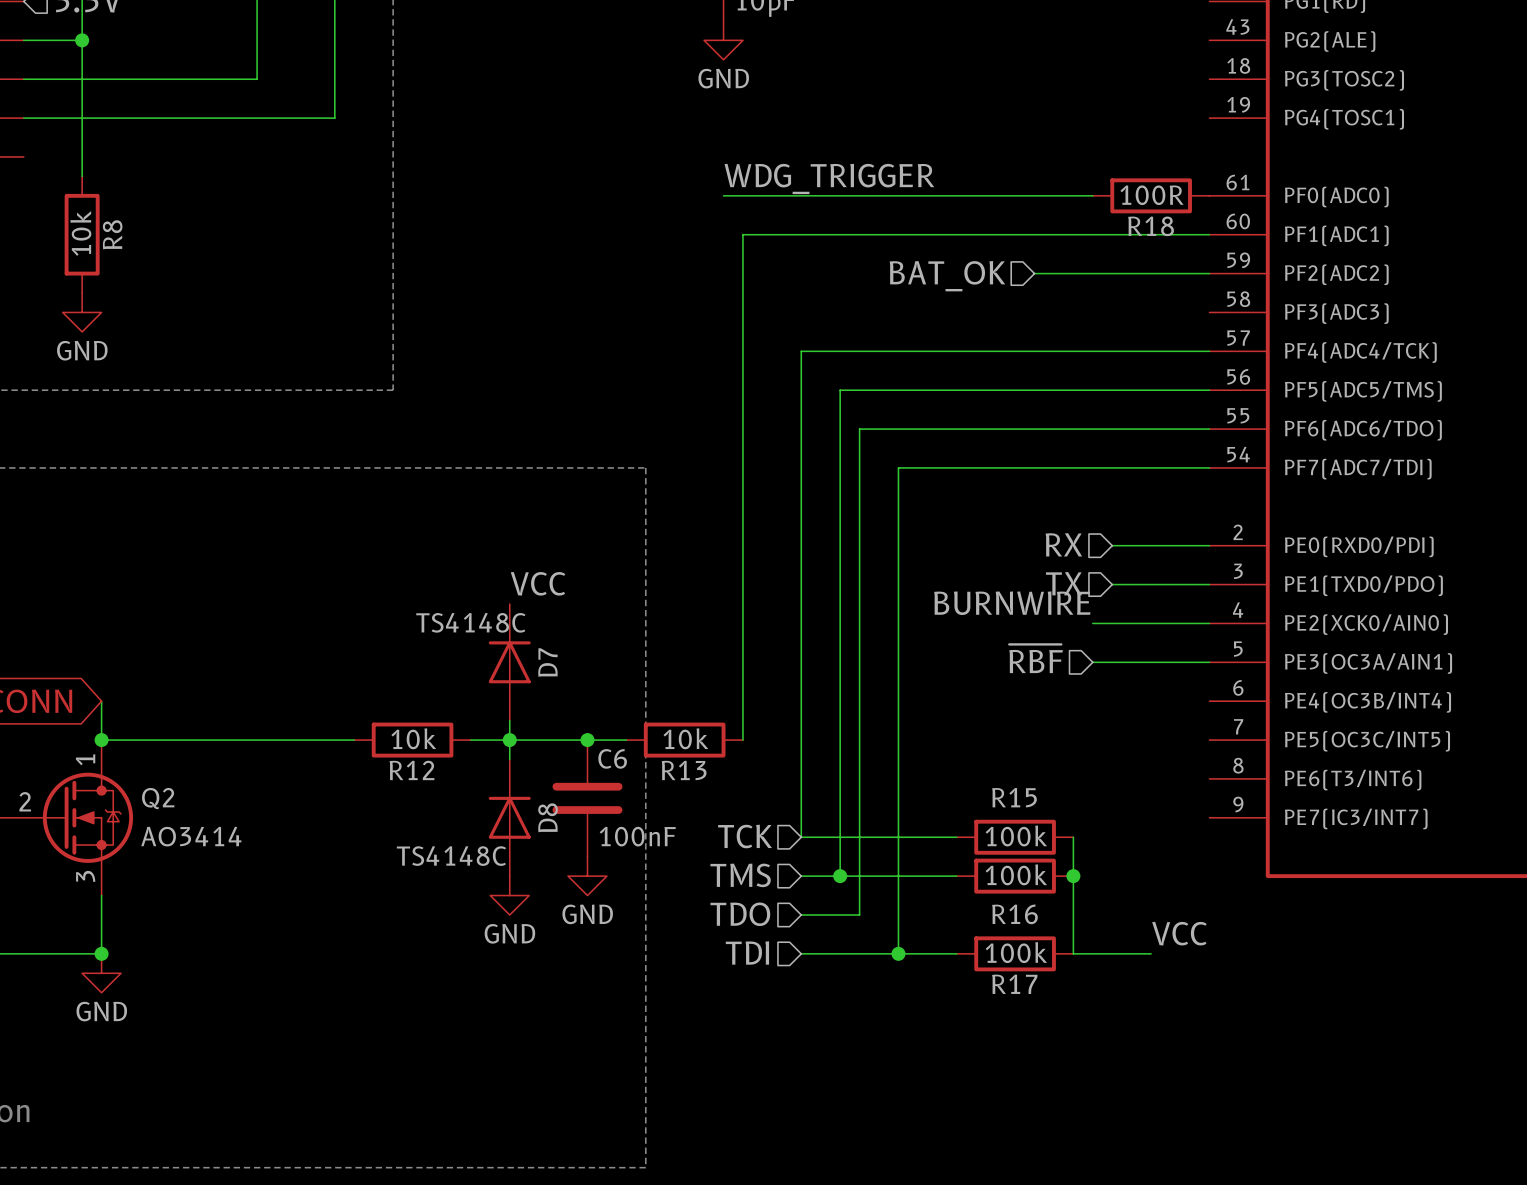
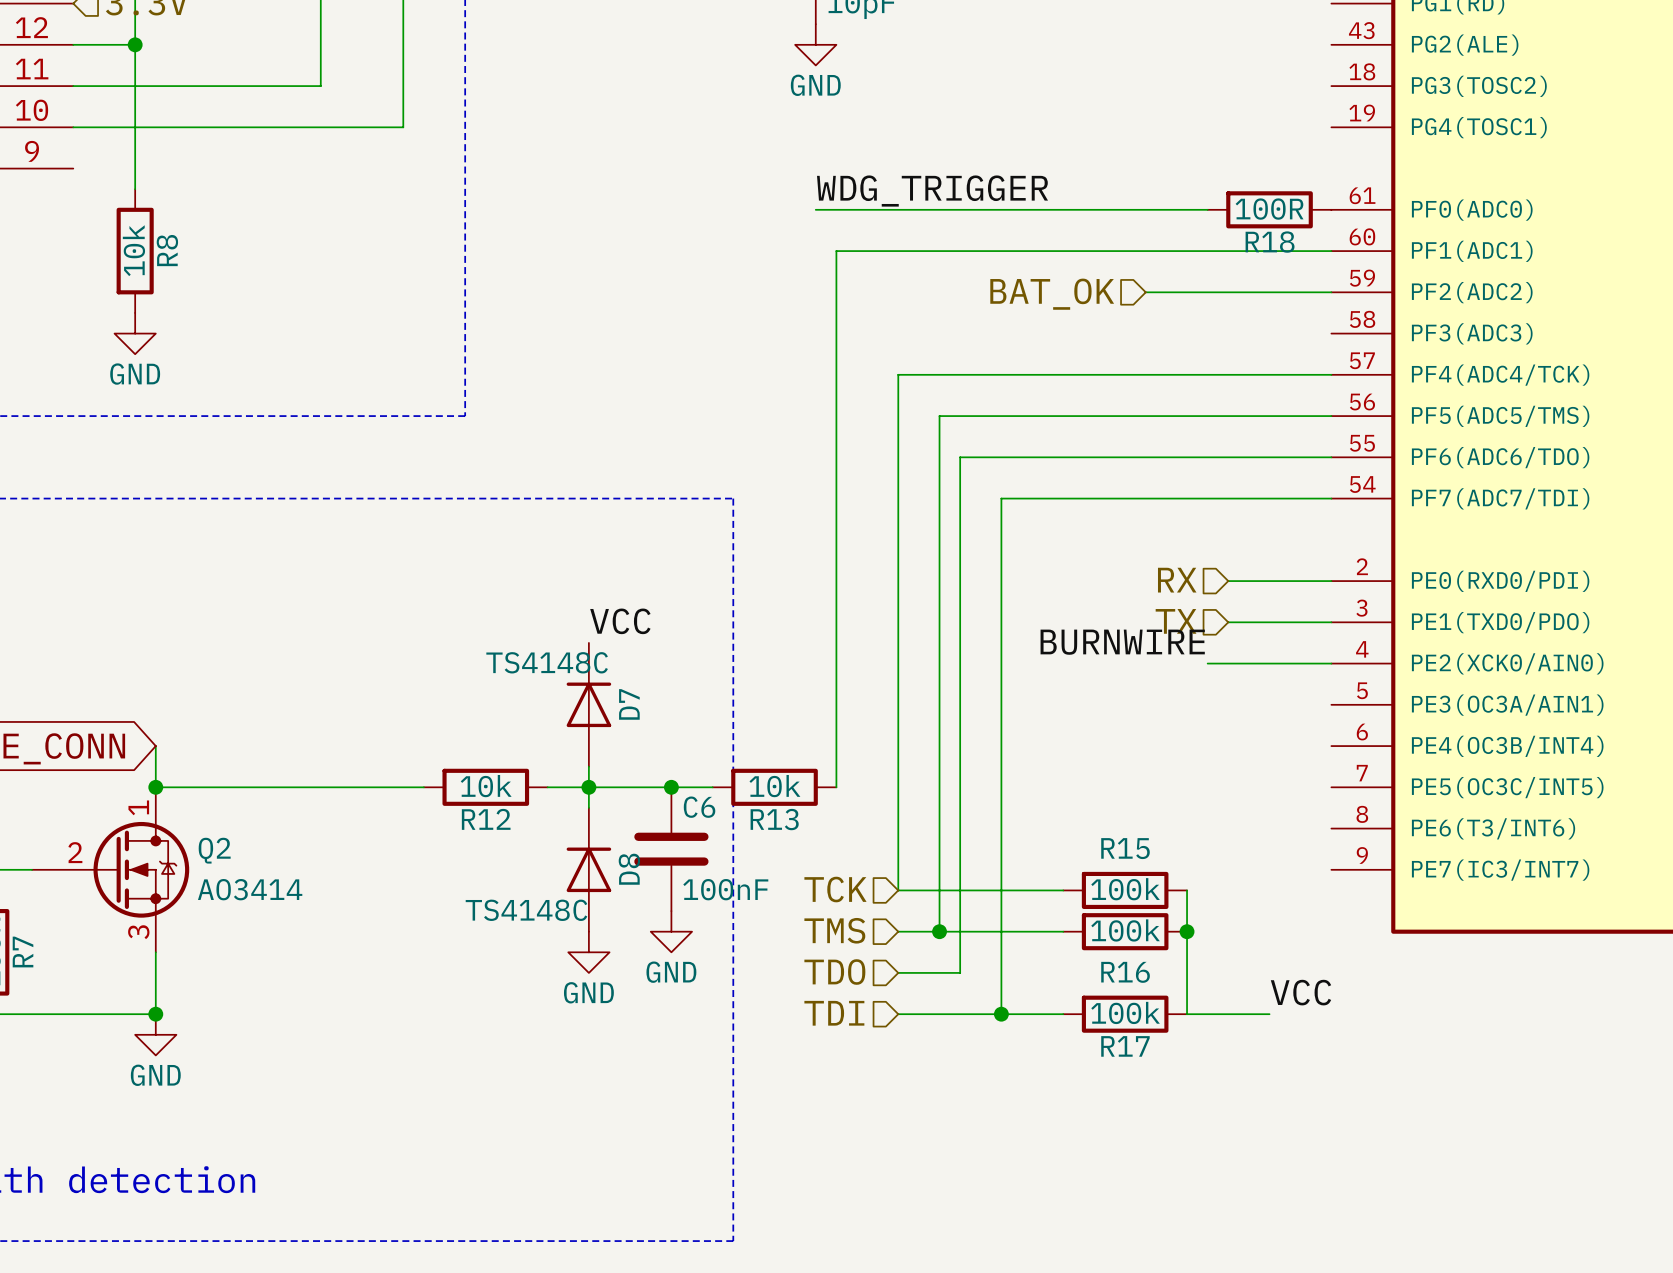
hierarchical label: ~{RBF} (1036, 658) -> none
wire: (1092, 662) (1209, 662) -> none

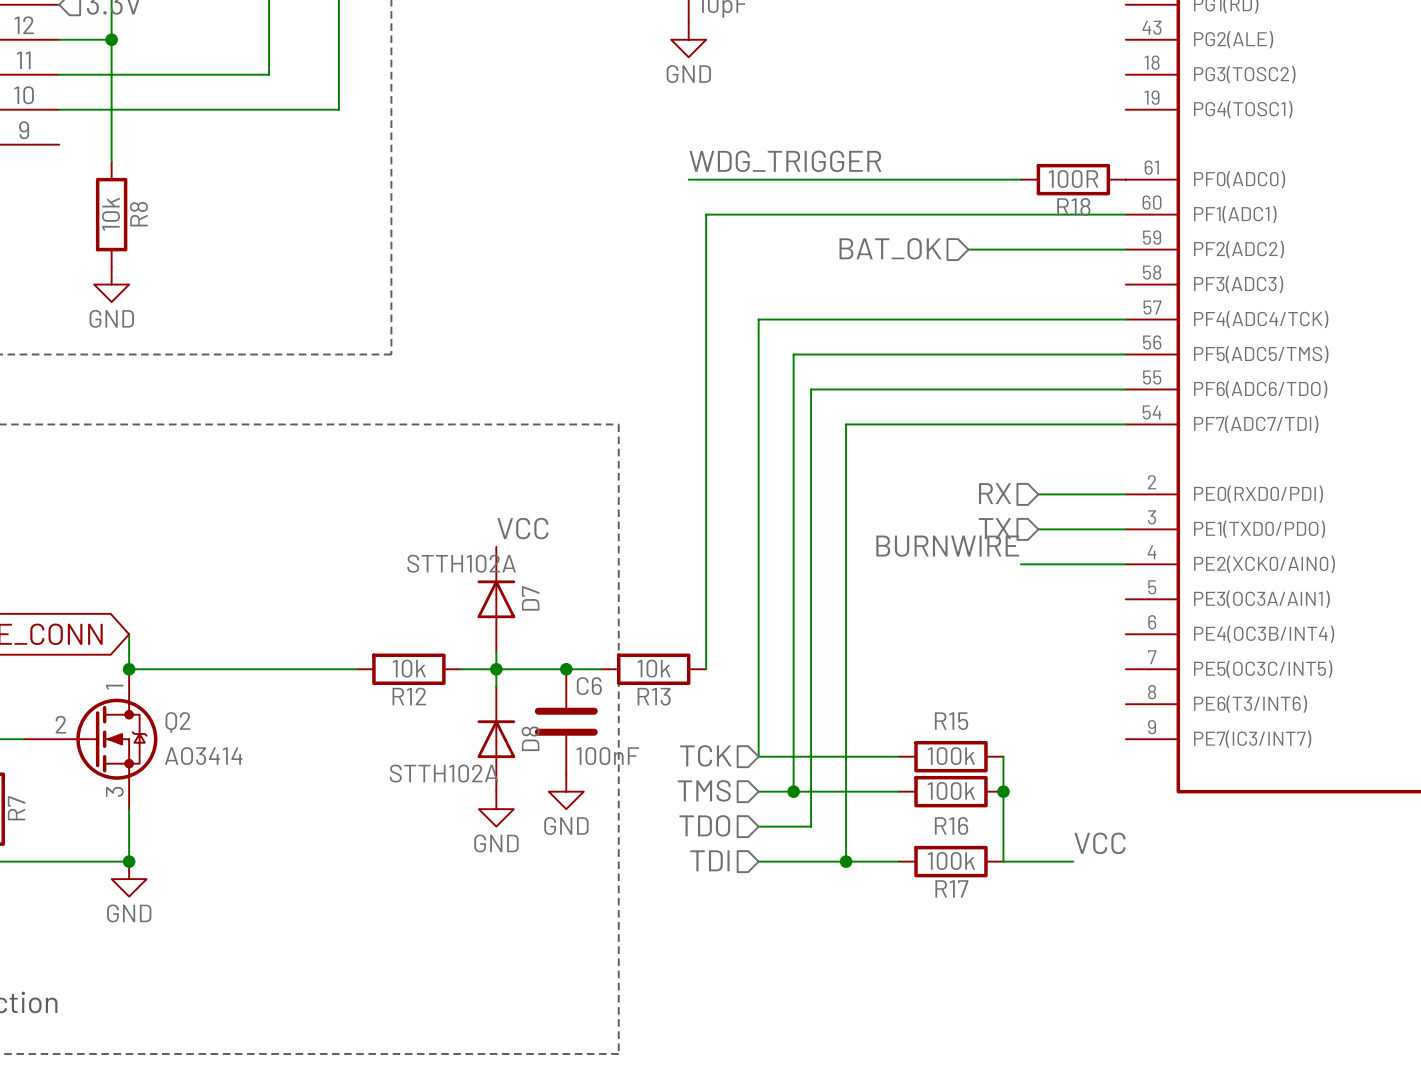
D7 value: TS4148C (547, 662) -> STTH102A (461, 563)
D8 value: TS4148C (526, 910) -> STTH102A (444, 773)

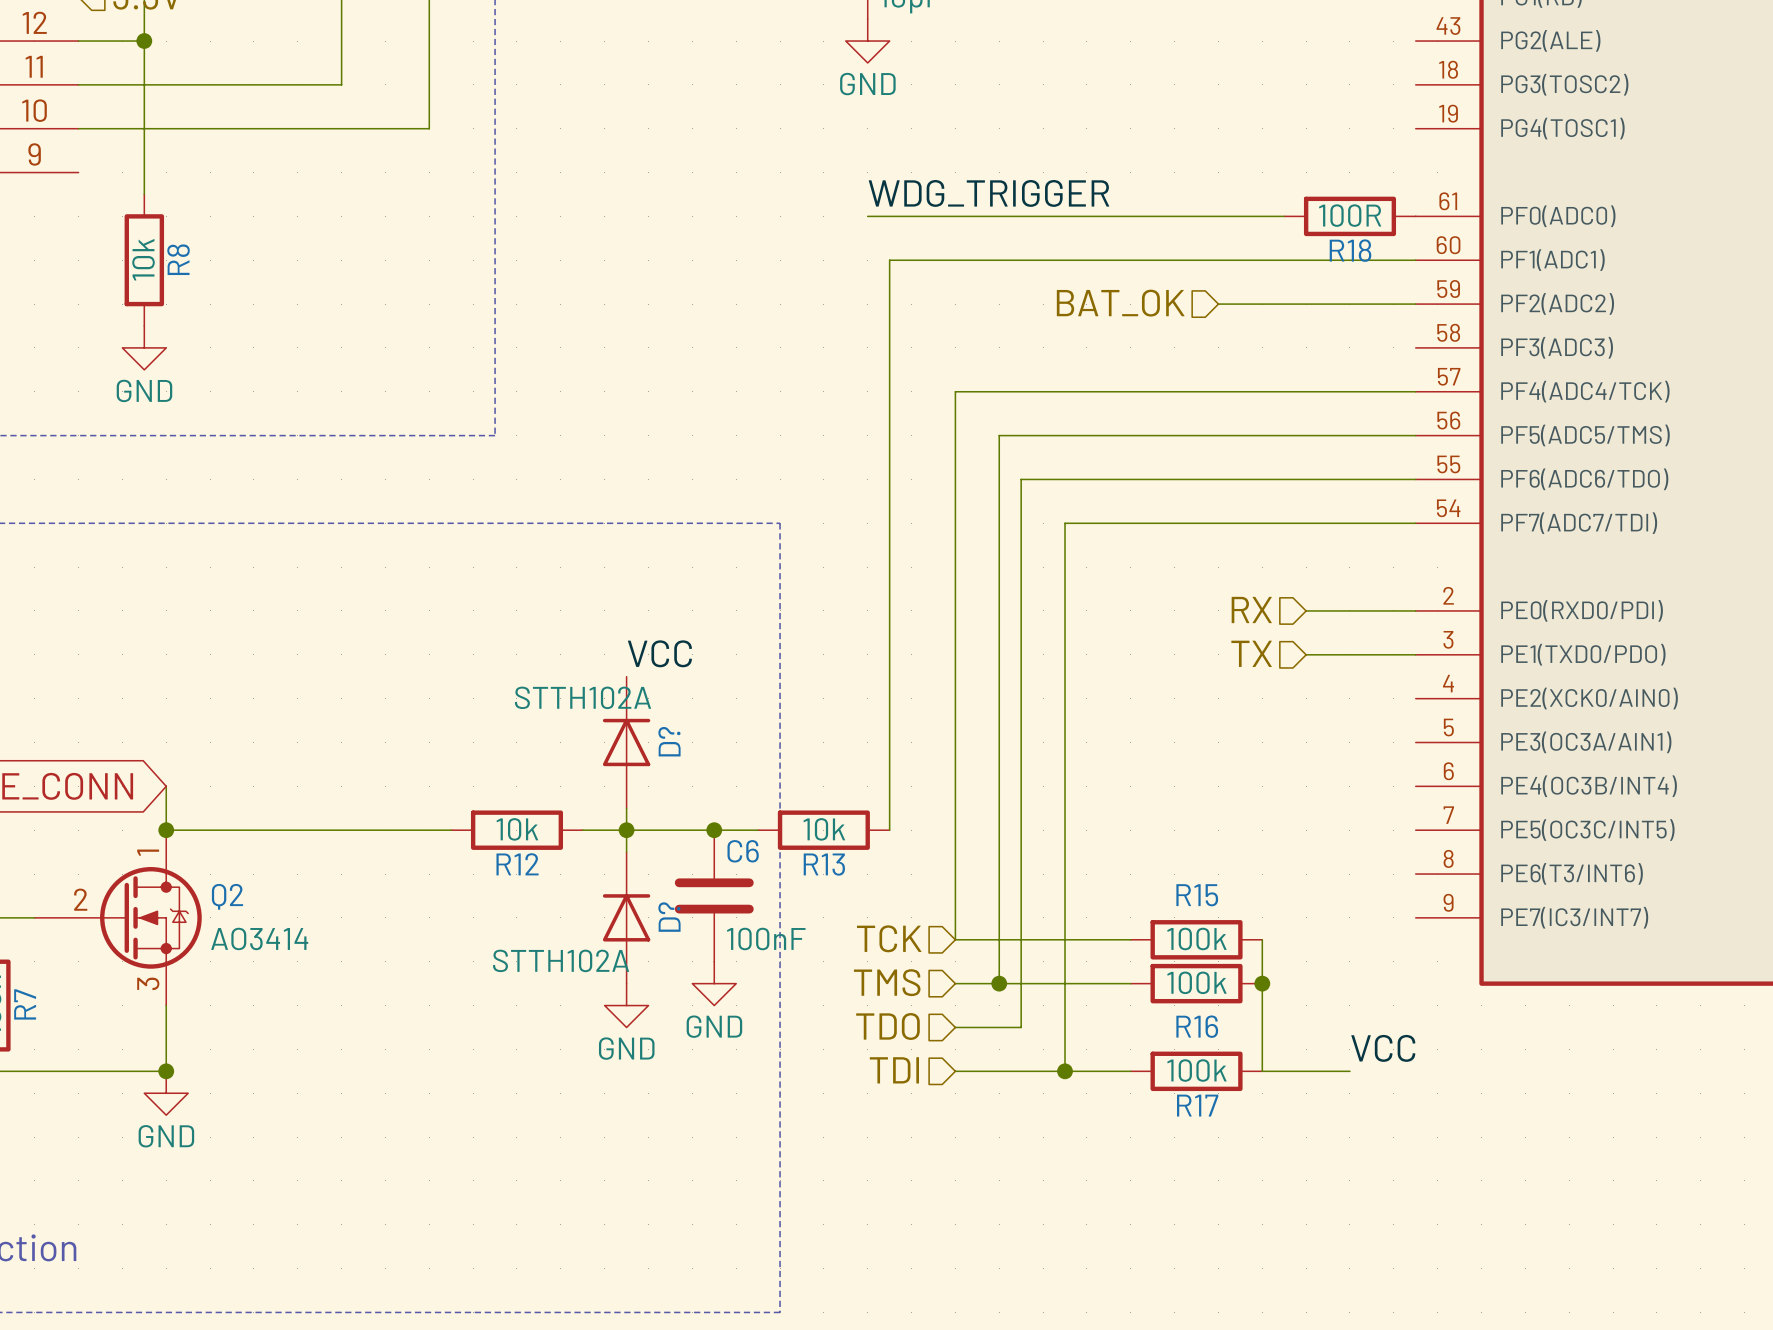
label: BURNWIRE (947, 546) -> none
wire: (1020, 564) (1125, 564) -> none
D7 name: D7 (530, 598) -> D? (669, 741)
D8 name: D8 (530, 738) -> D? (669, 917)

